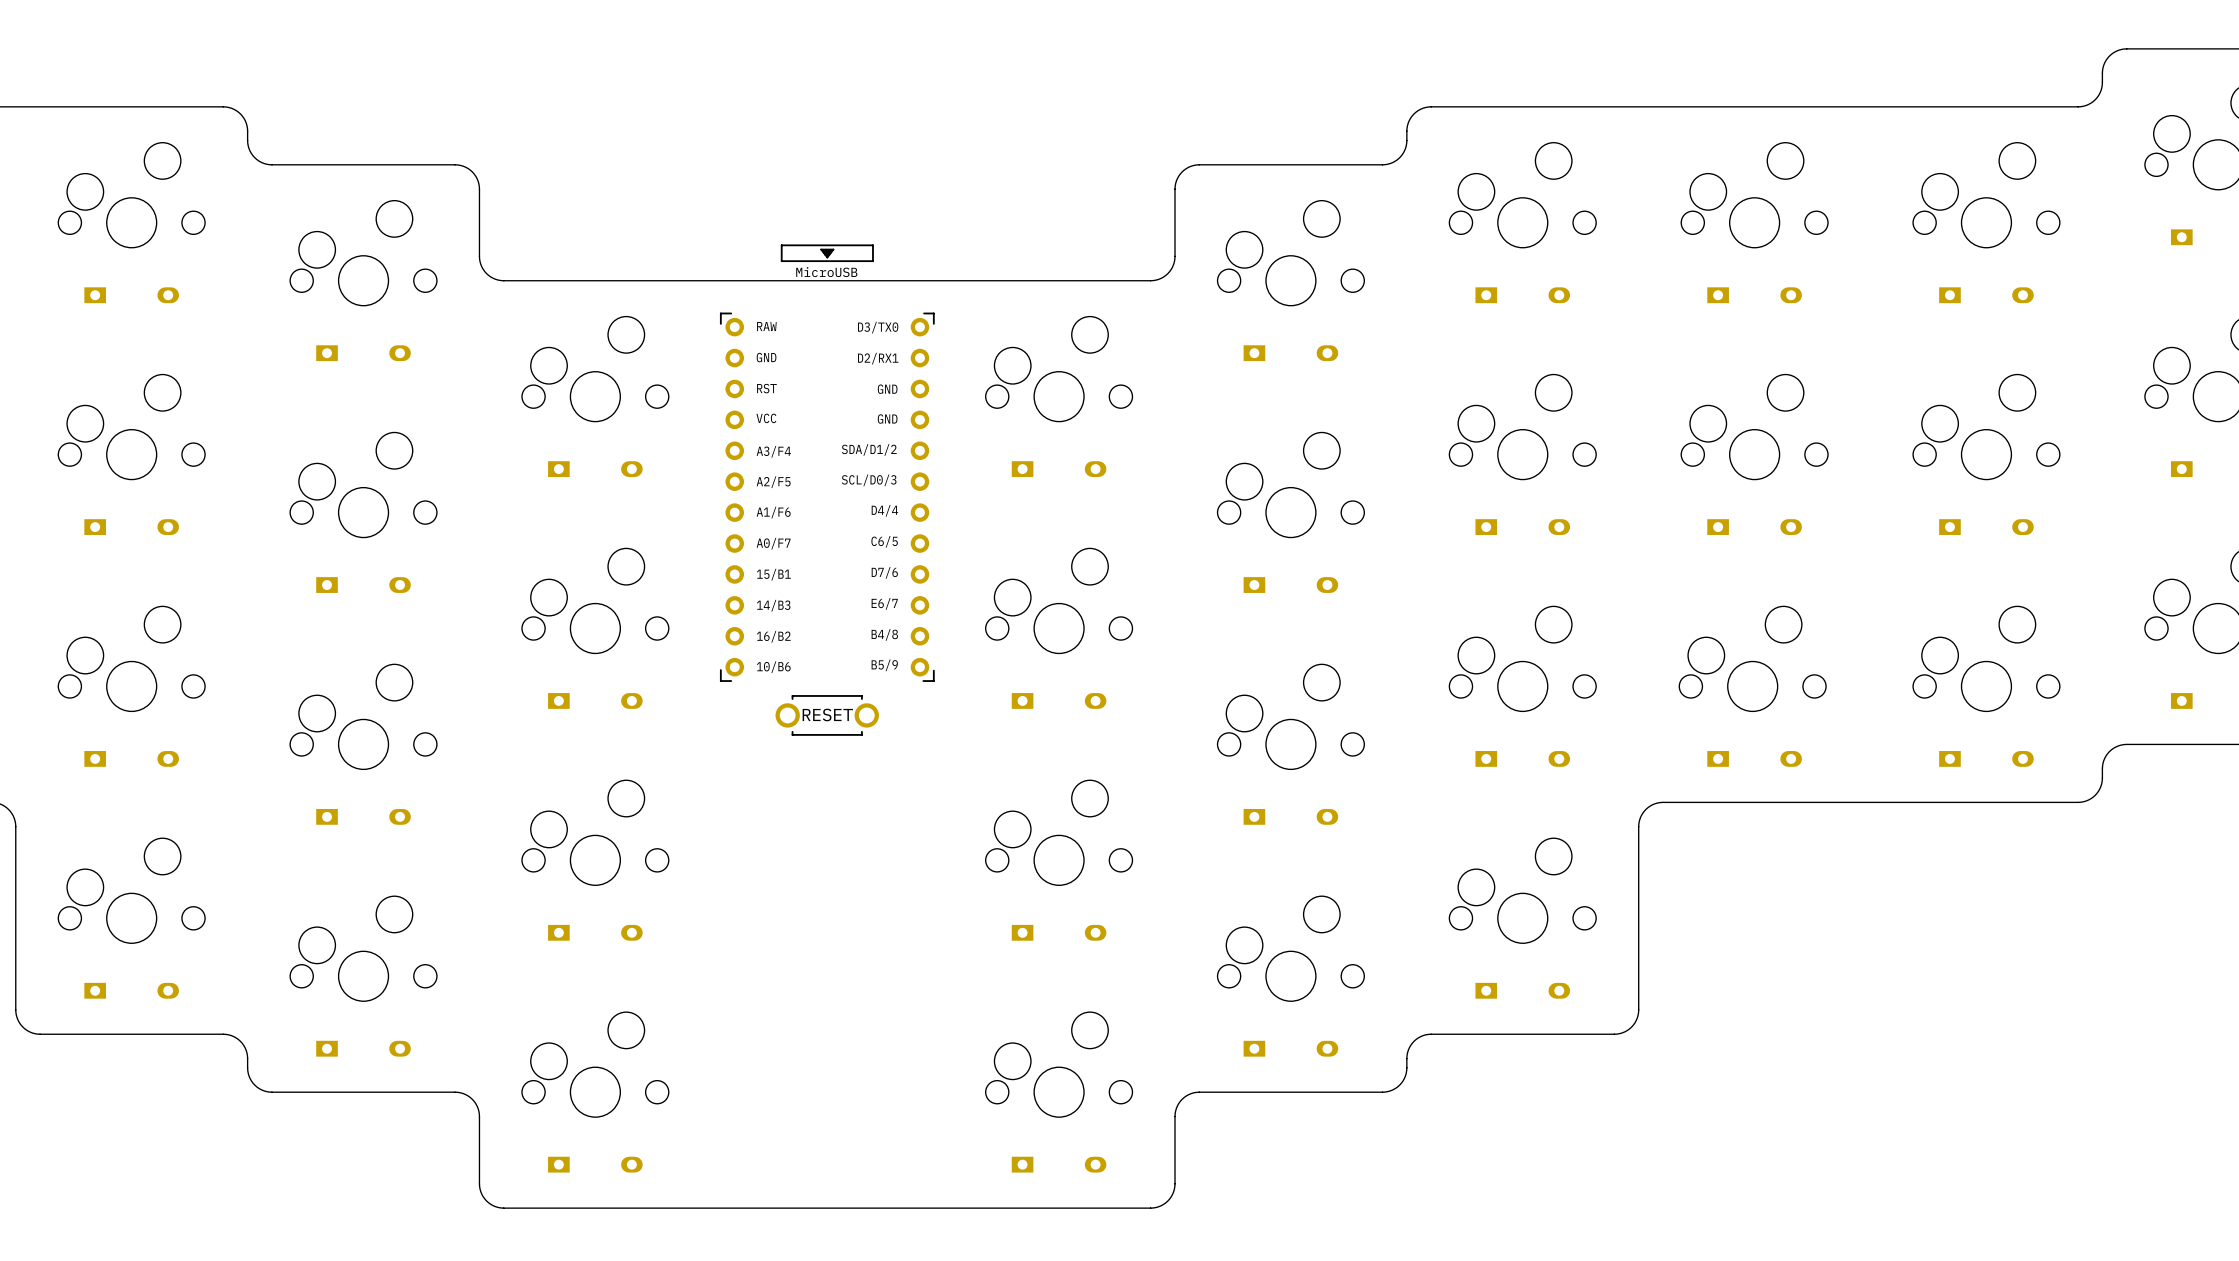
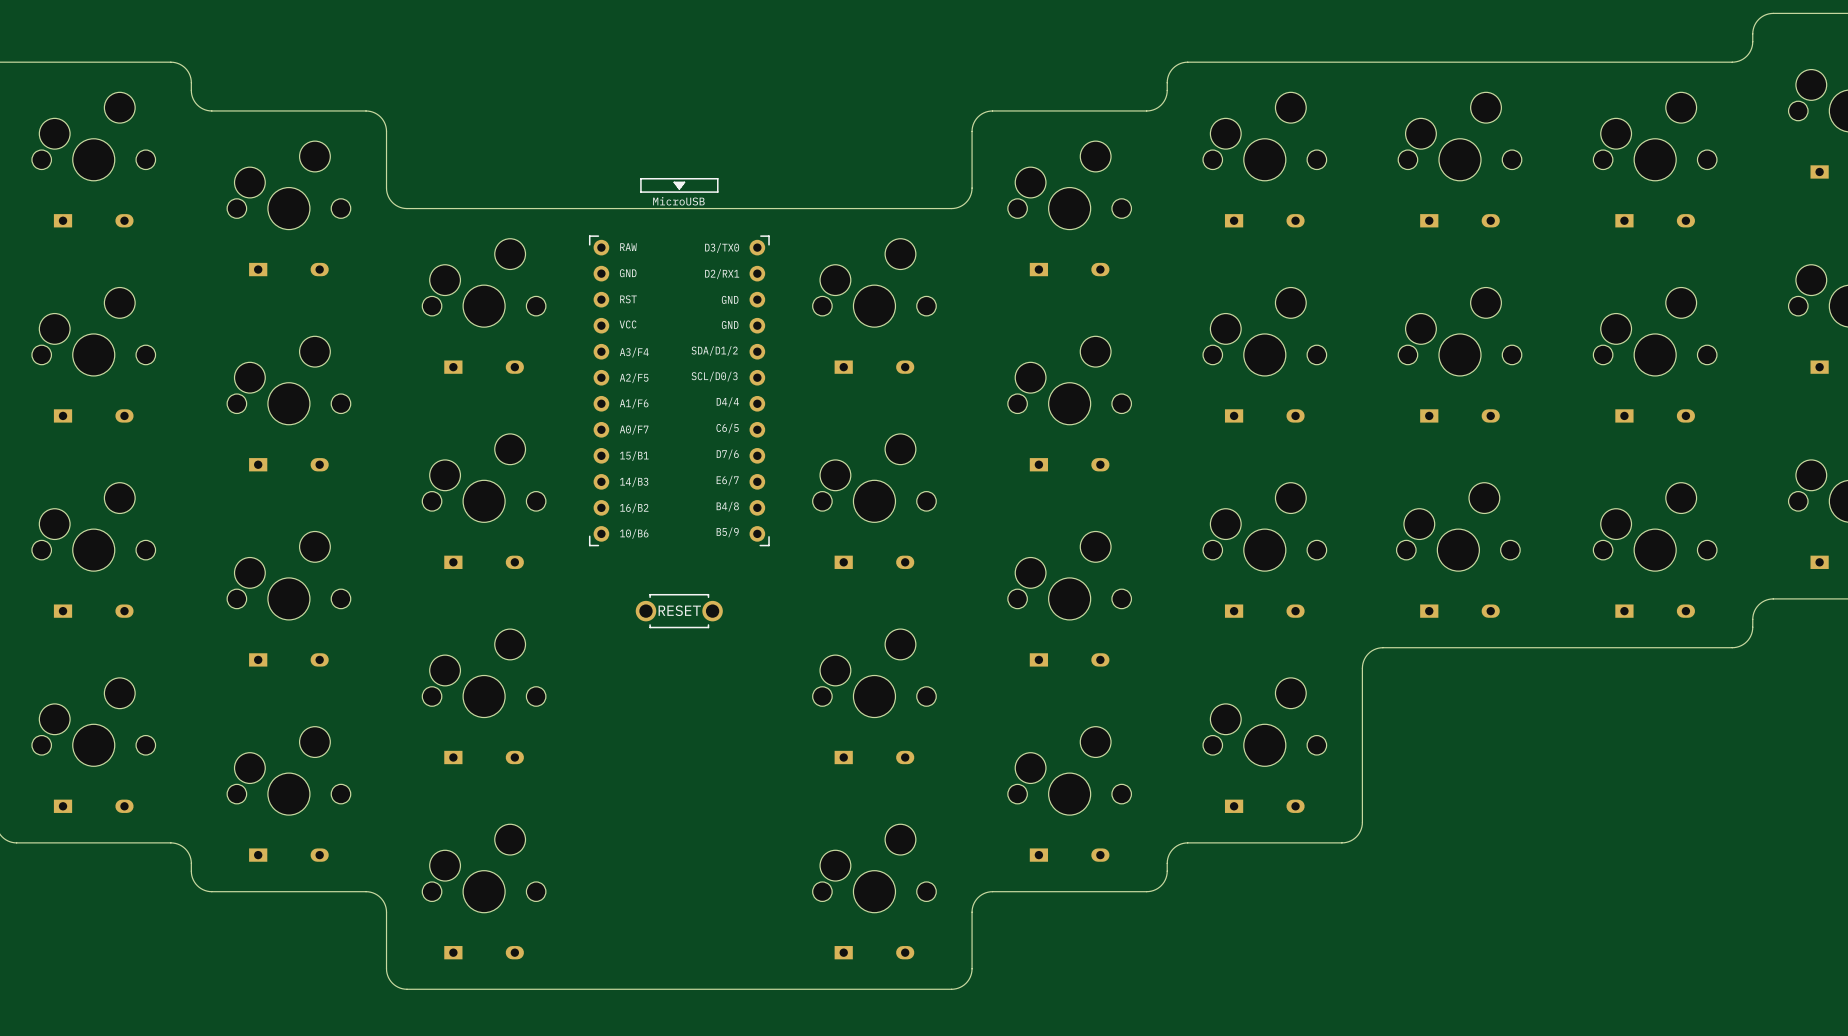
part position: (827, 715) -> (679, 611)

